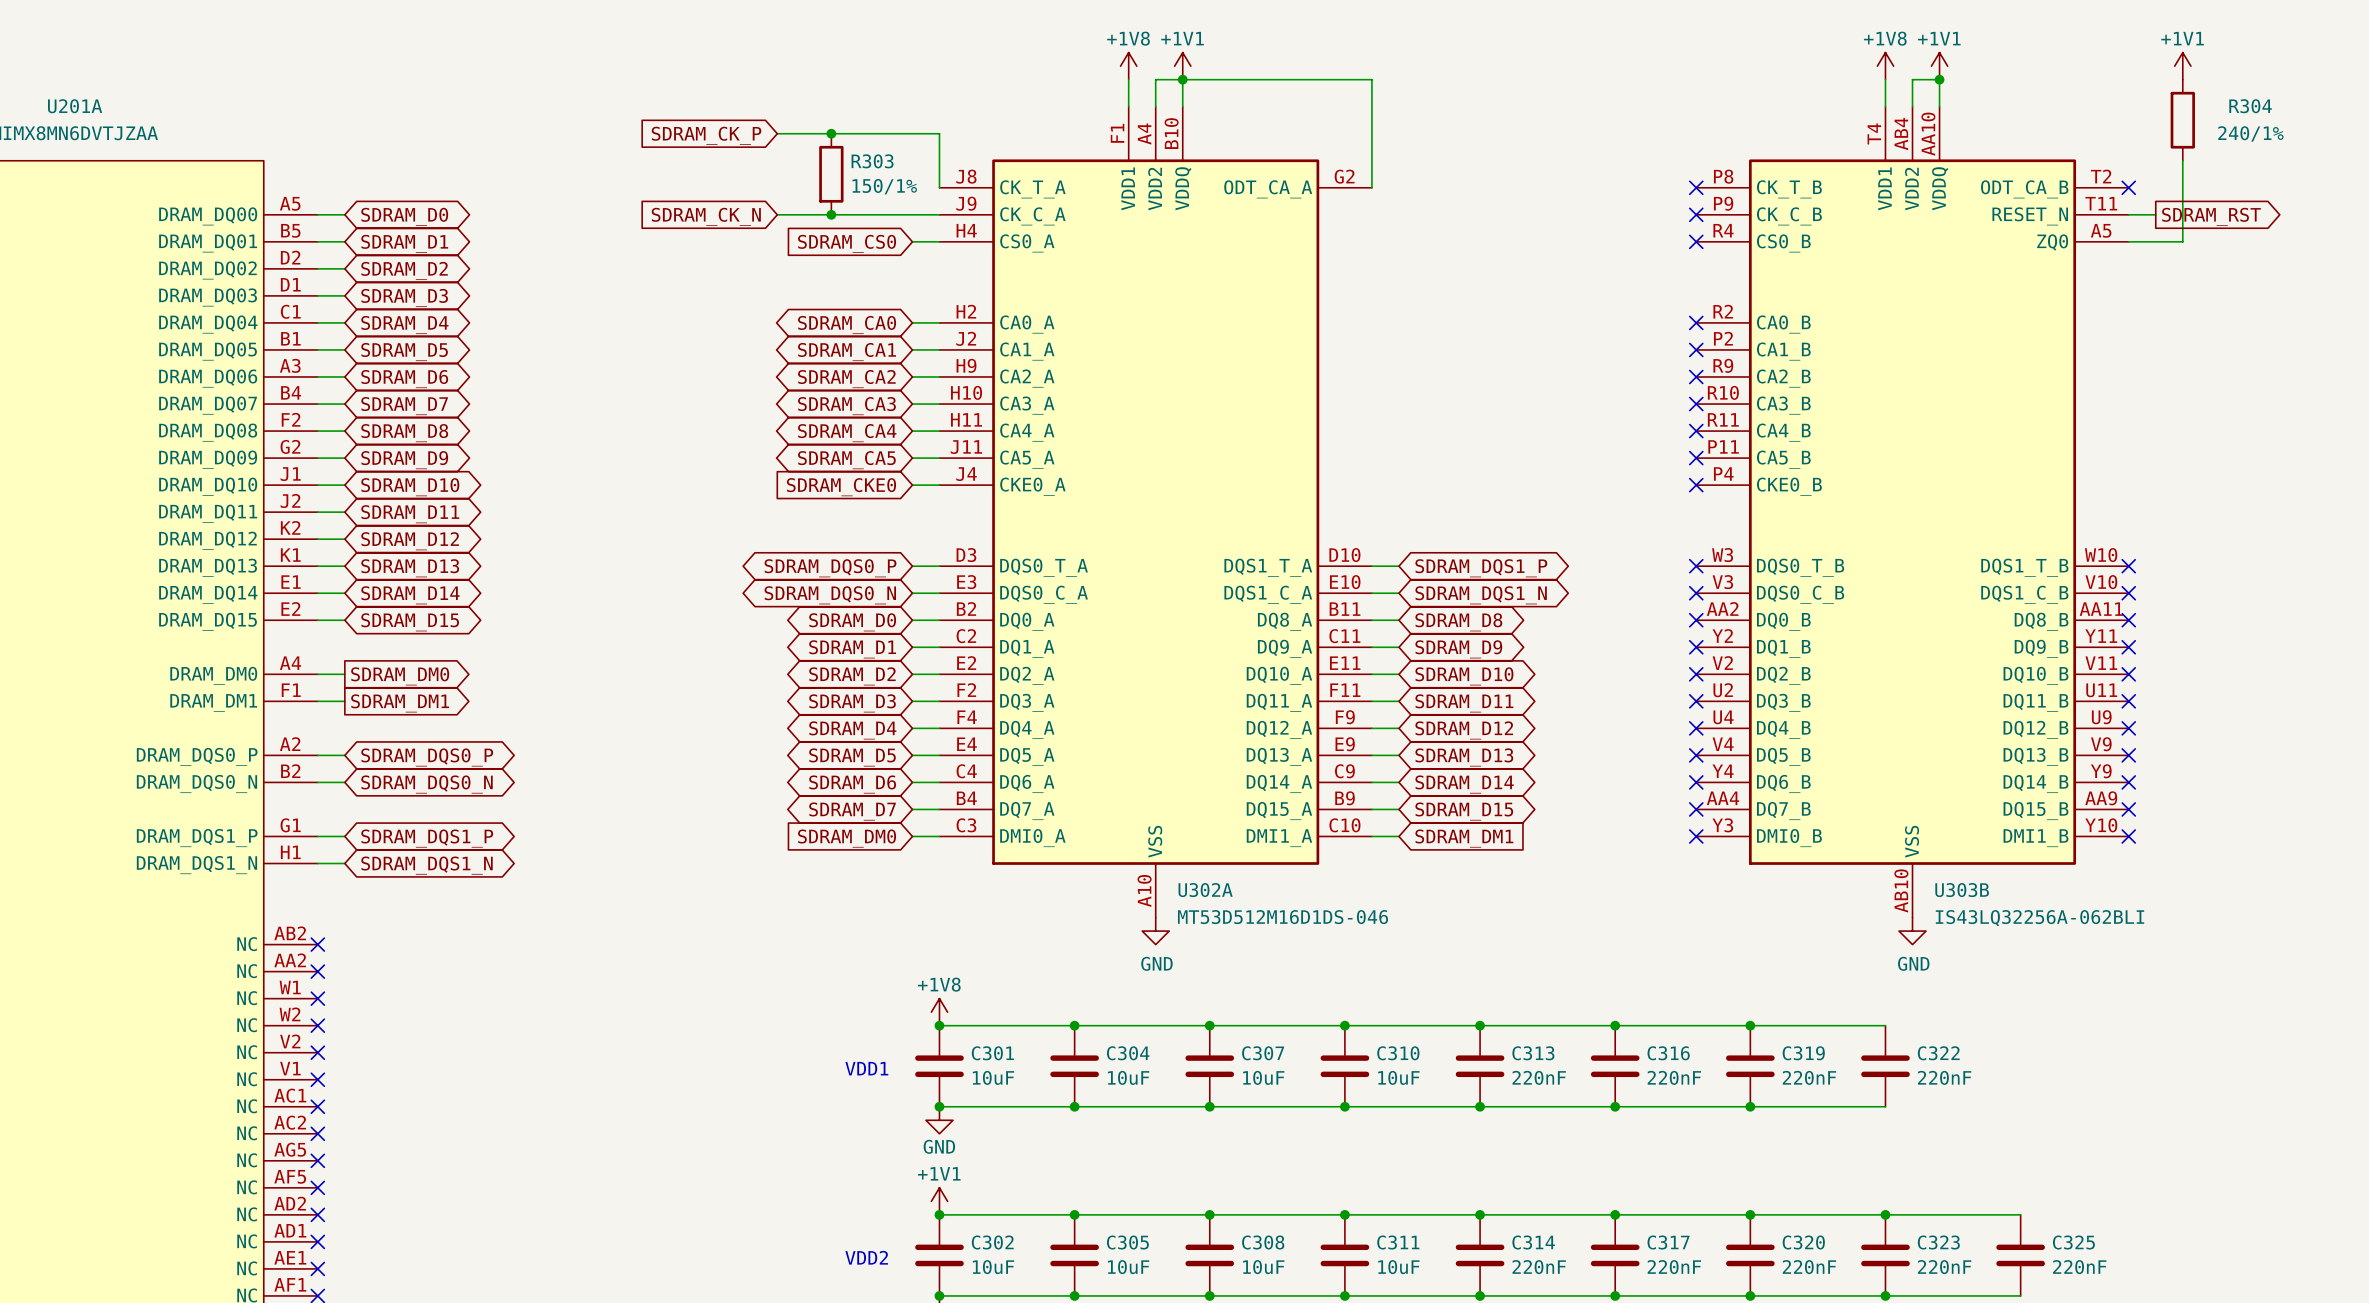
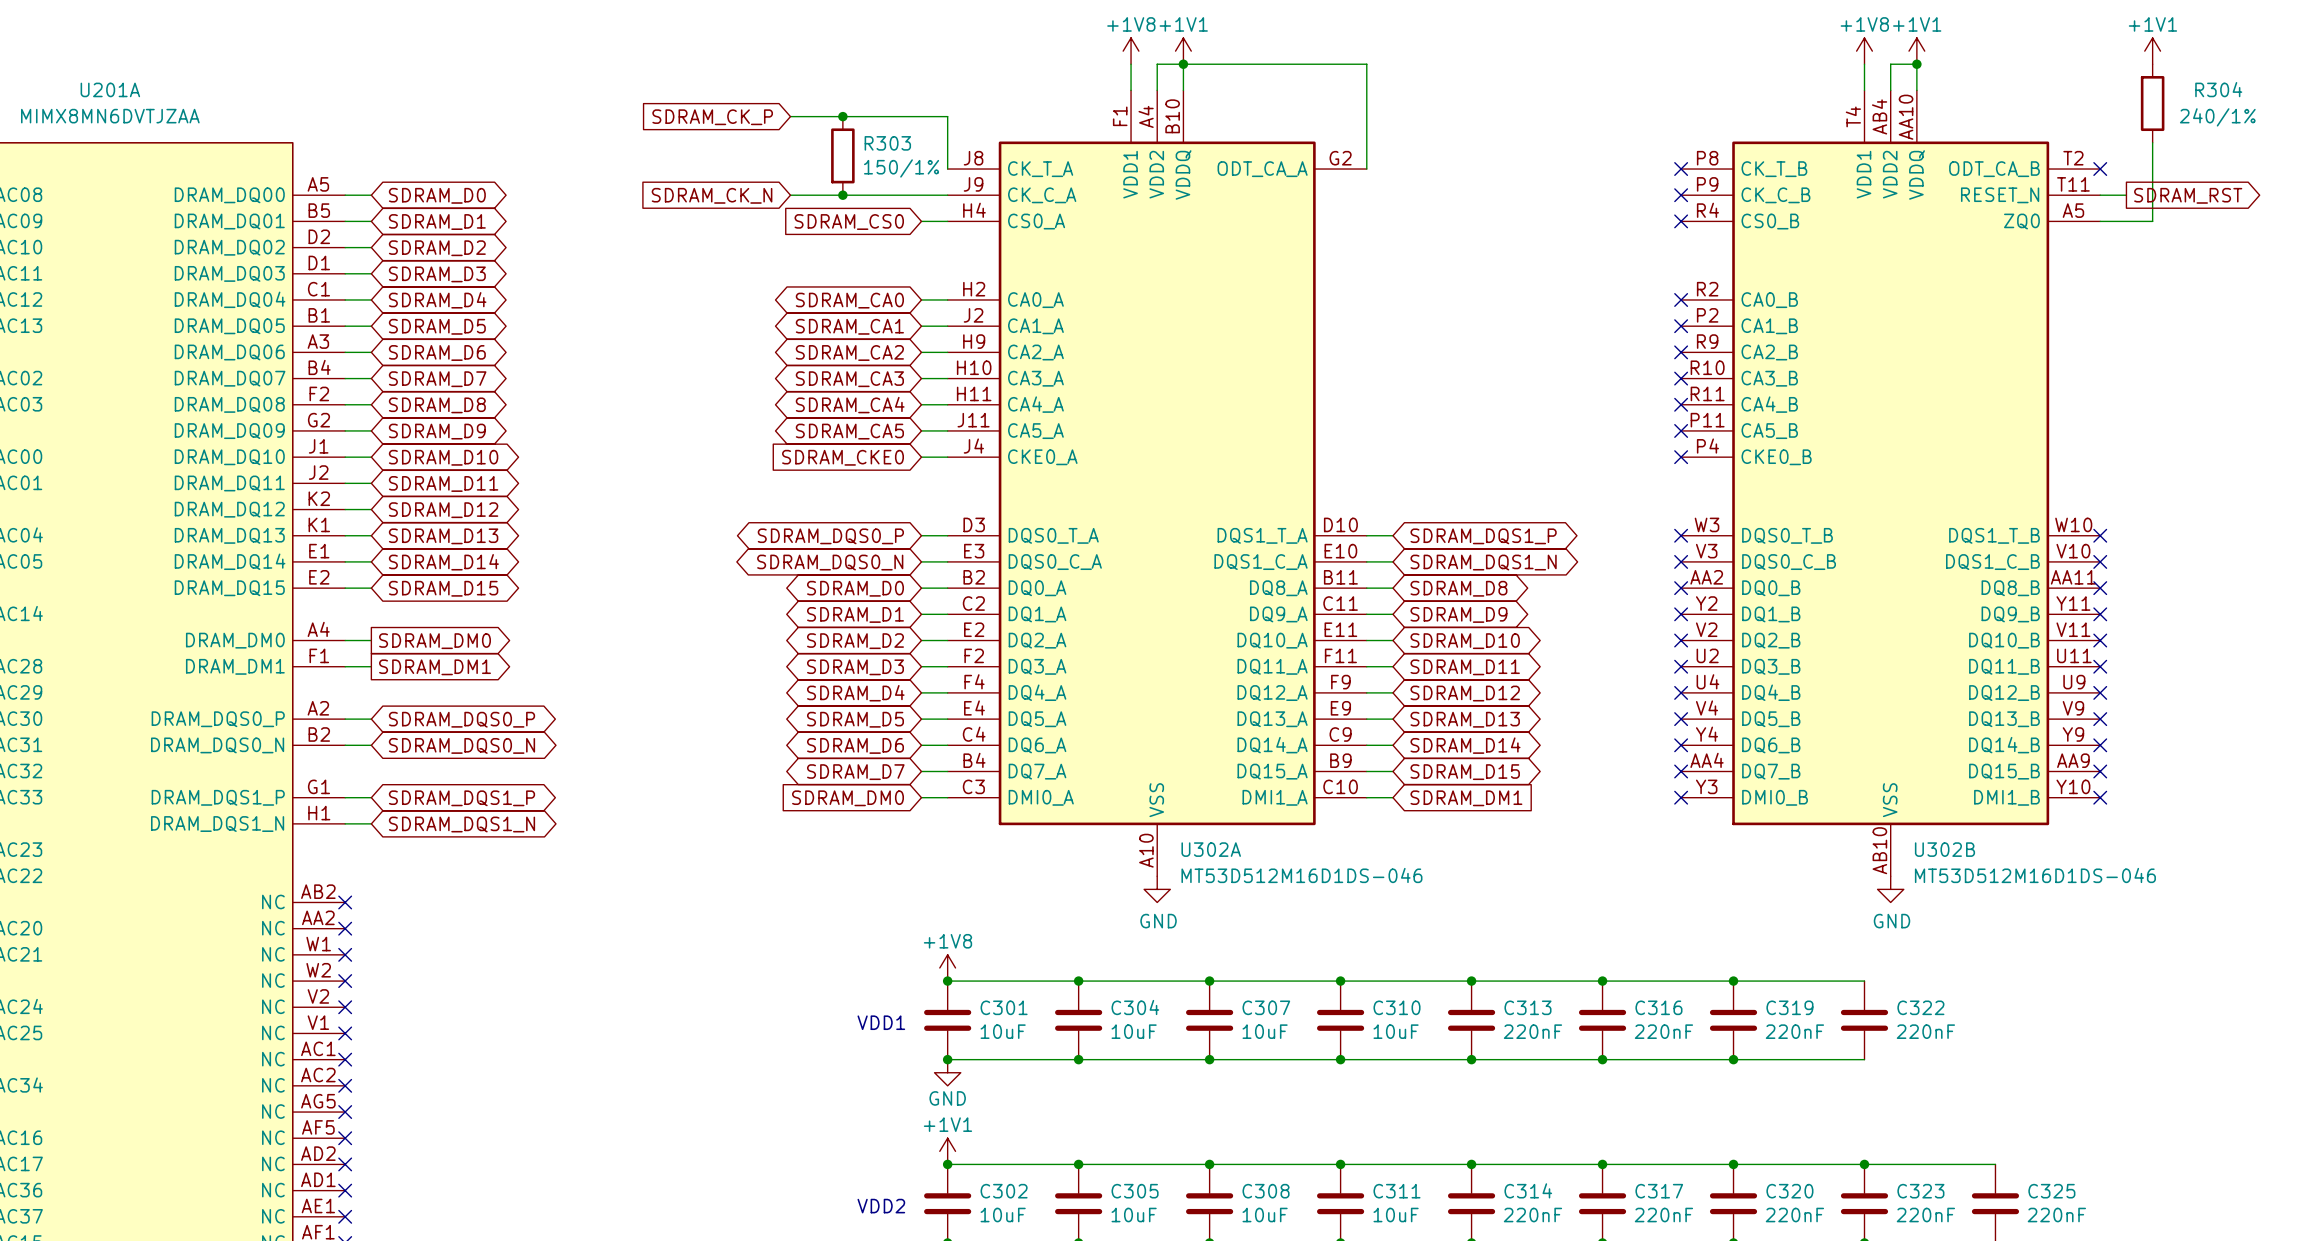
U303B name: U303B (1962, 890) -> U302B (1944, 849)
U303B value: IS43LQ32256A-062BLI (2040, 918) -> MT53D512M16D1DS-046 (2035, 875)

